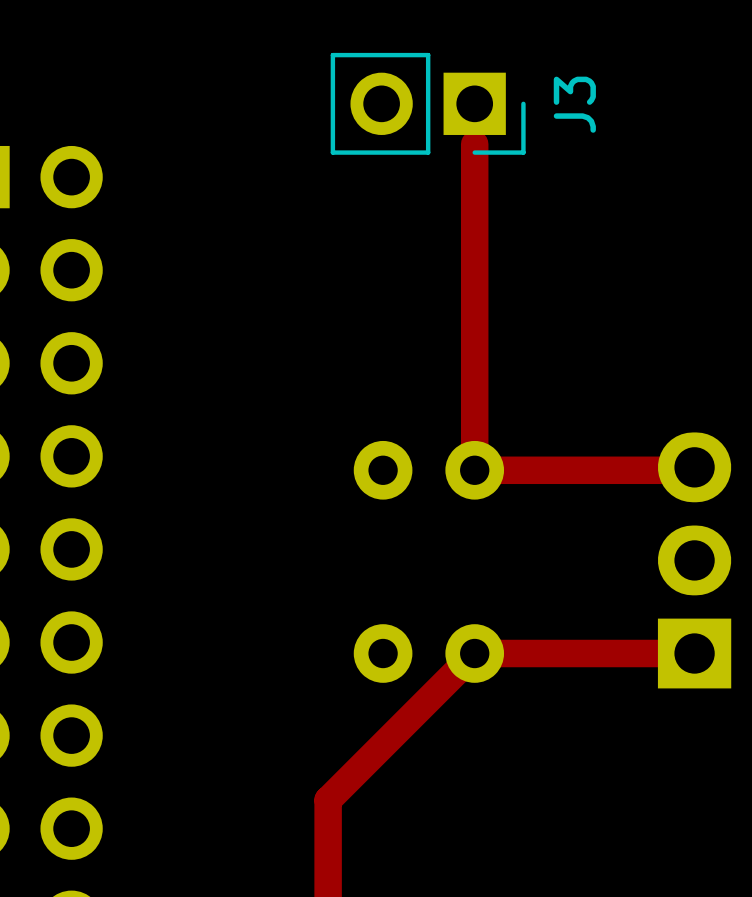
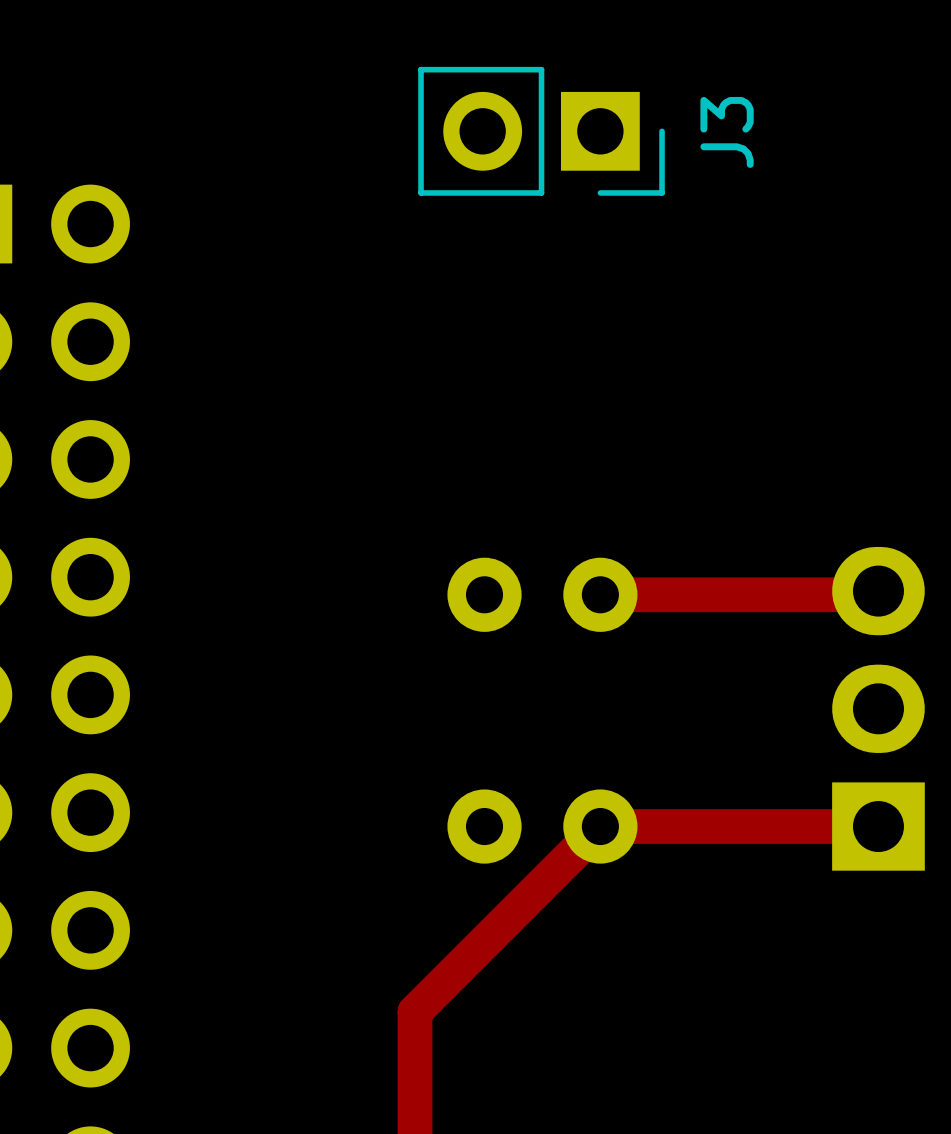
top track: (474, 103) (474, 470) -> none

